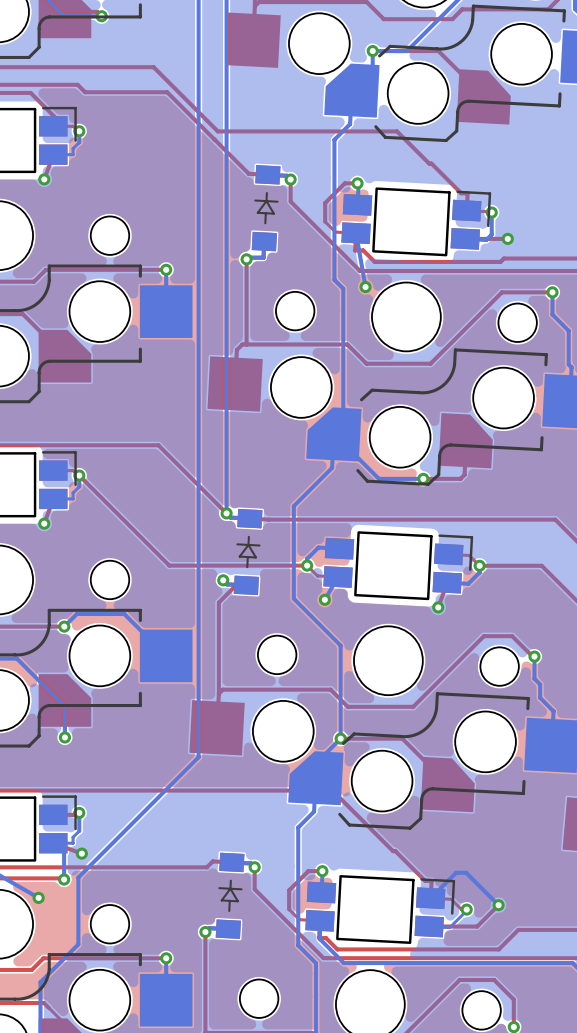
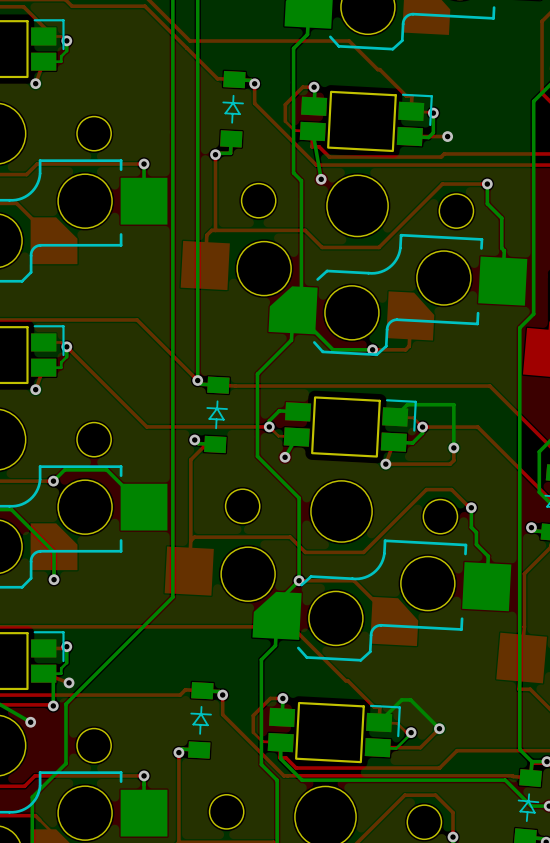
bottom track: none -> (395, 416) (407, 404) (453, 404) (453, 447)
top track: none -> (453, 447) (453, 460) (450, 464) (385, 464)
via: none -> (453, 447)

